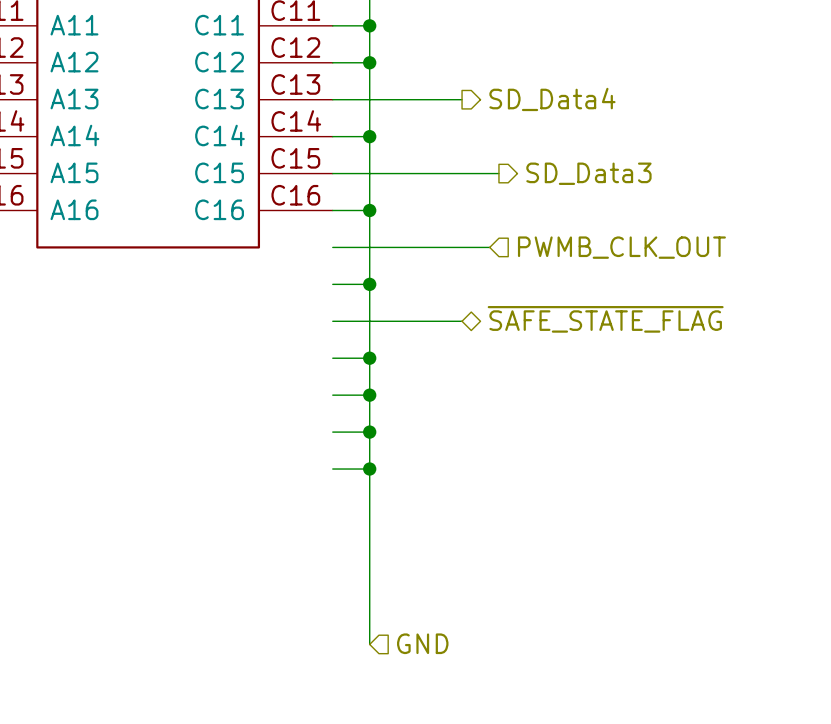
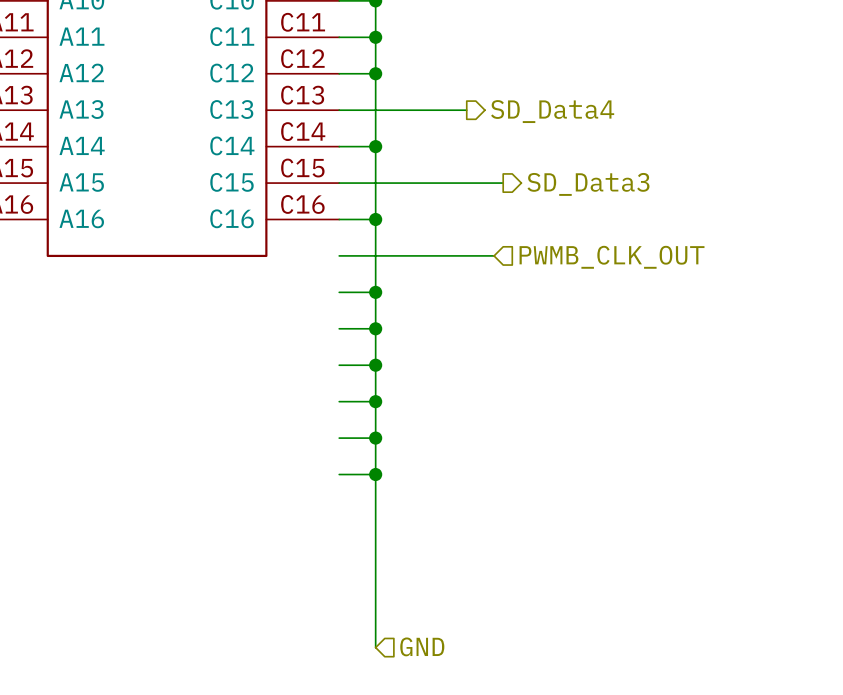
hierarchical label: ~{SAFE_STATE_FLAG} (605, 319) -> none
wire: (369, 321) (462, 321) -> none
junction: none -> (375, 328)

